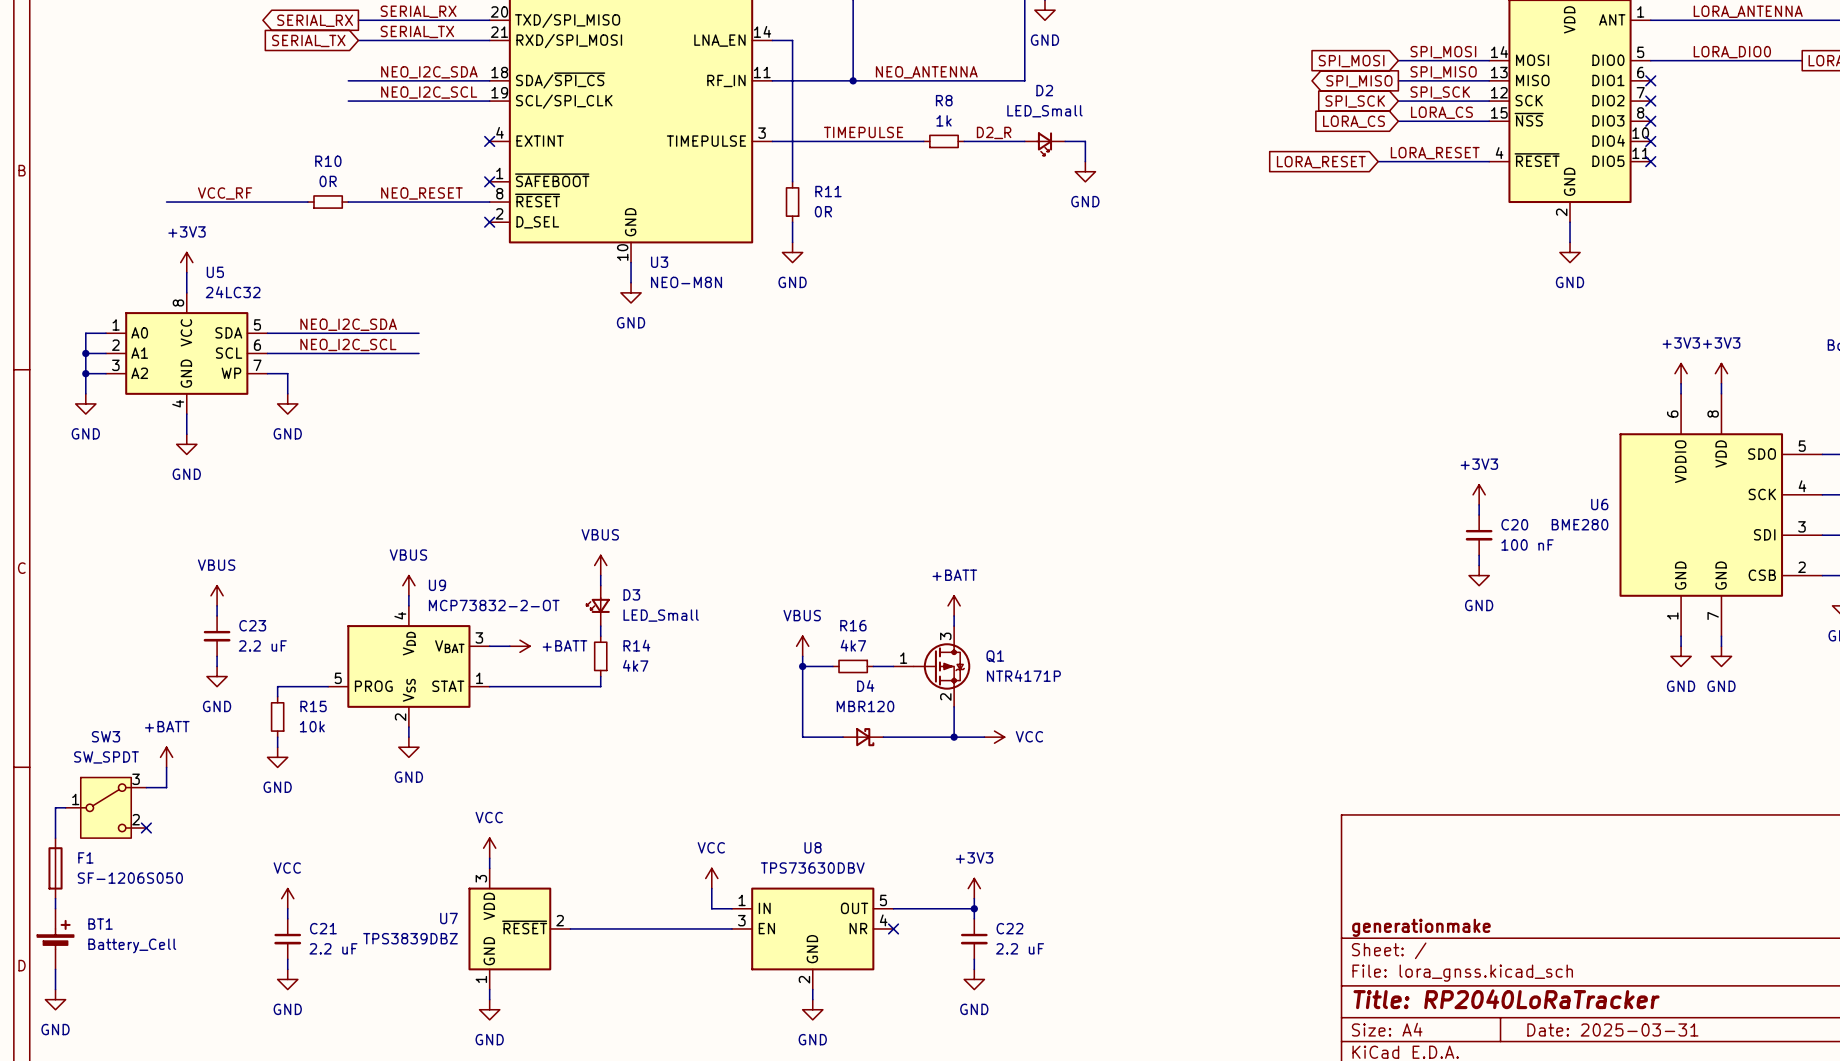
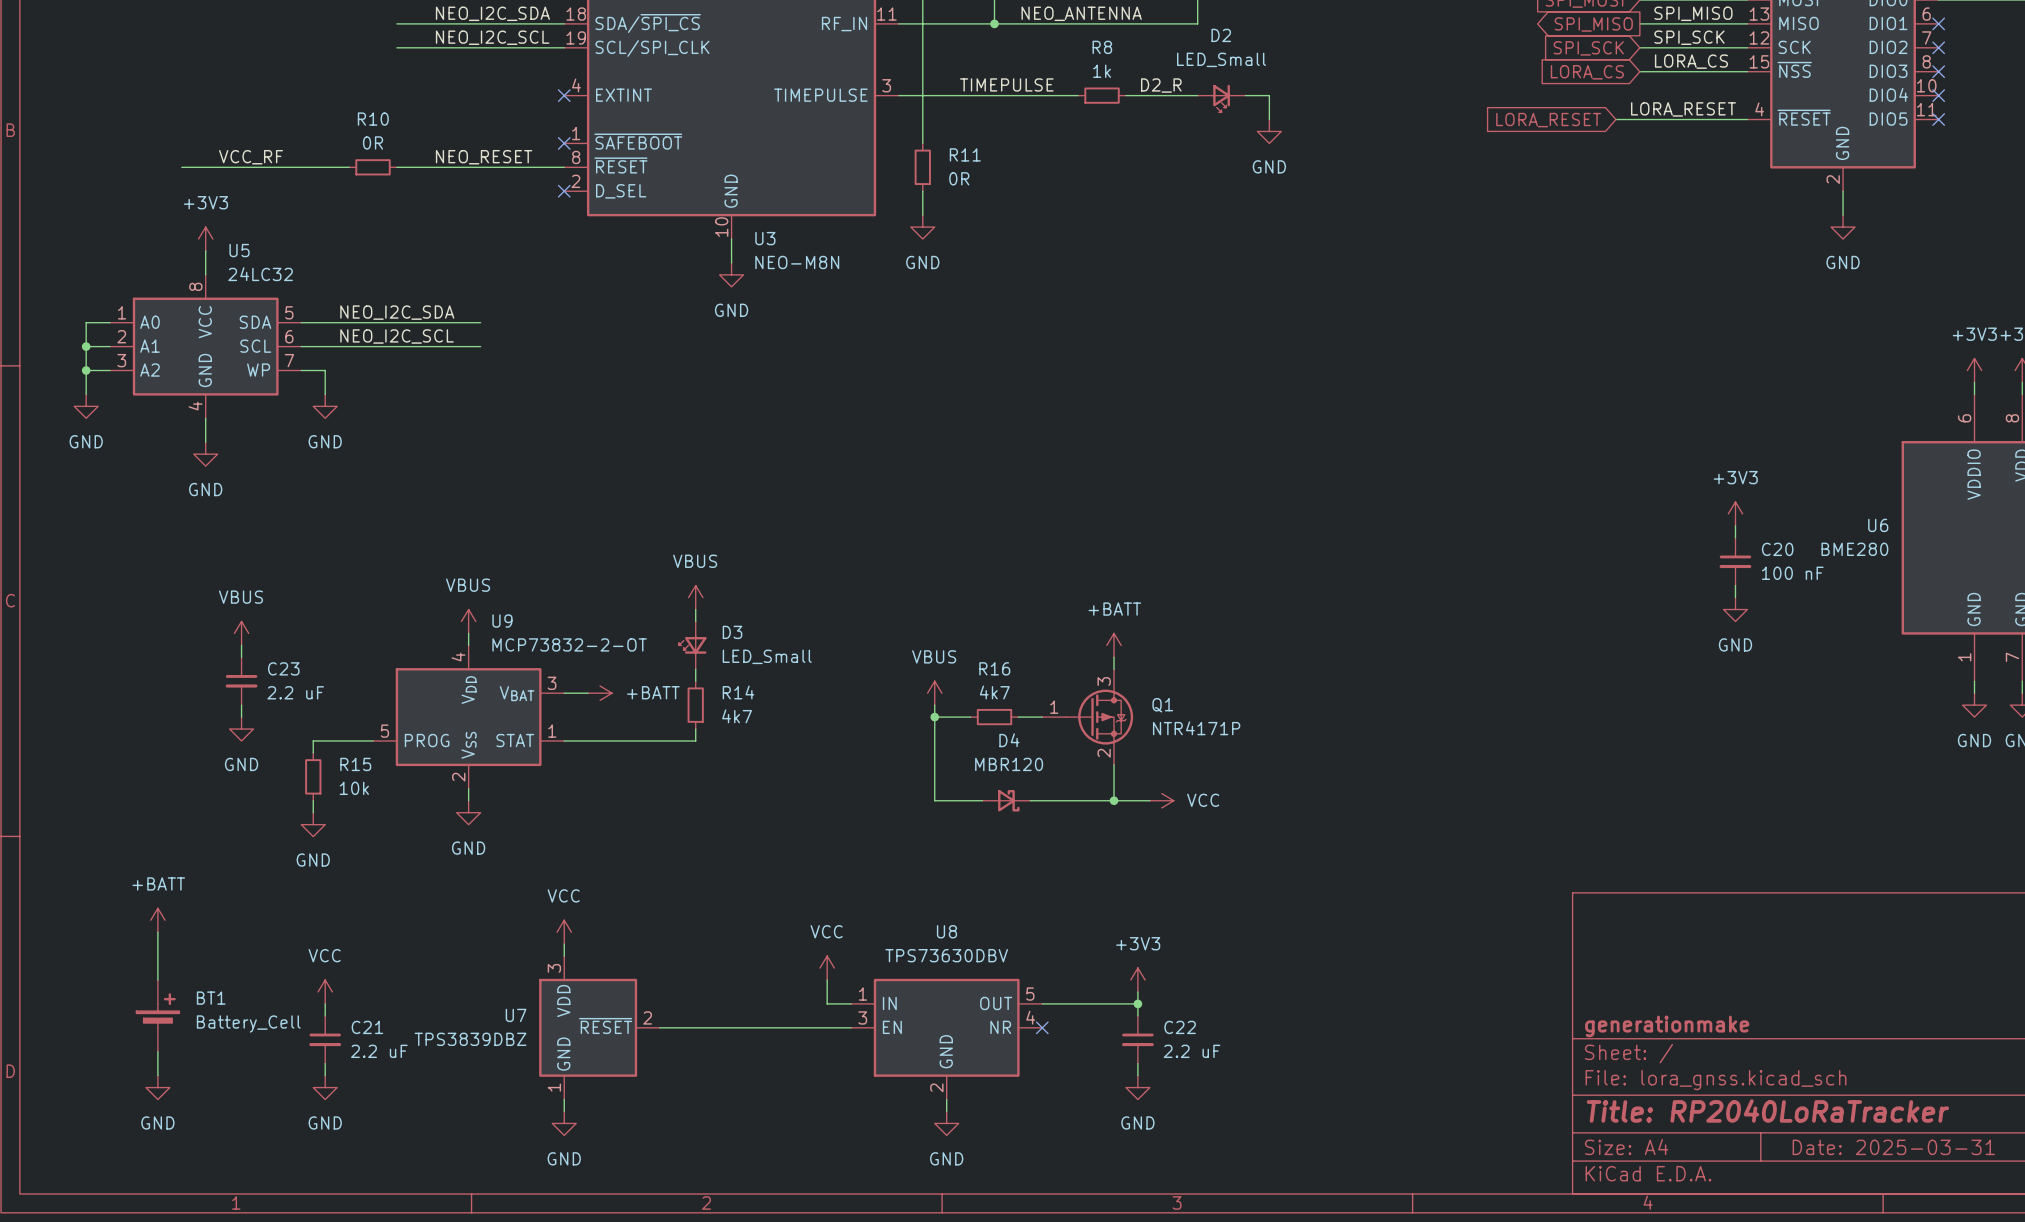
power symbol position: +BATT (166, 757) -> +BATT (157, 920)
wire: (166, 767) (166, 787) (146, 787) -> none
wire: (65, 807) (55, 807) (55, 838) -> none
SW3: SW_SPDT (106, 807) -> none
no-connect mark: (146, 828) -> none
wire: none -> (157, 932) (157, 980)
F1: SF-1206S050 (55, 868) -> none
wire: (55, 898) (55, 908) -> none
BT1 position: (55, 939) -> (157, 1015)
wire: (55, 969) (55, 989) -> (157, 1051) (157, 1075)
power symbol position: GND (55, 999) -> GND (157, 1087)

